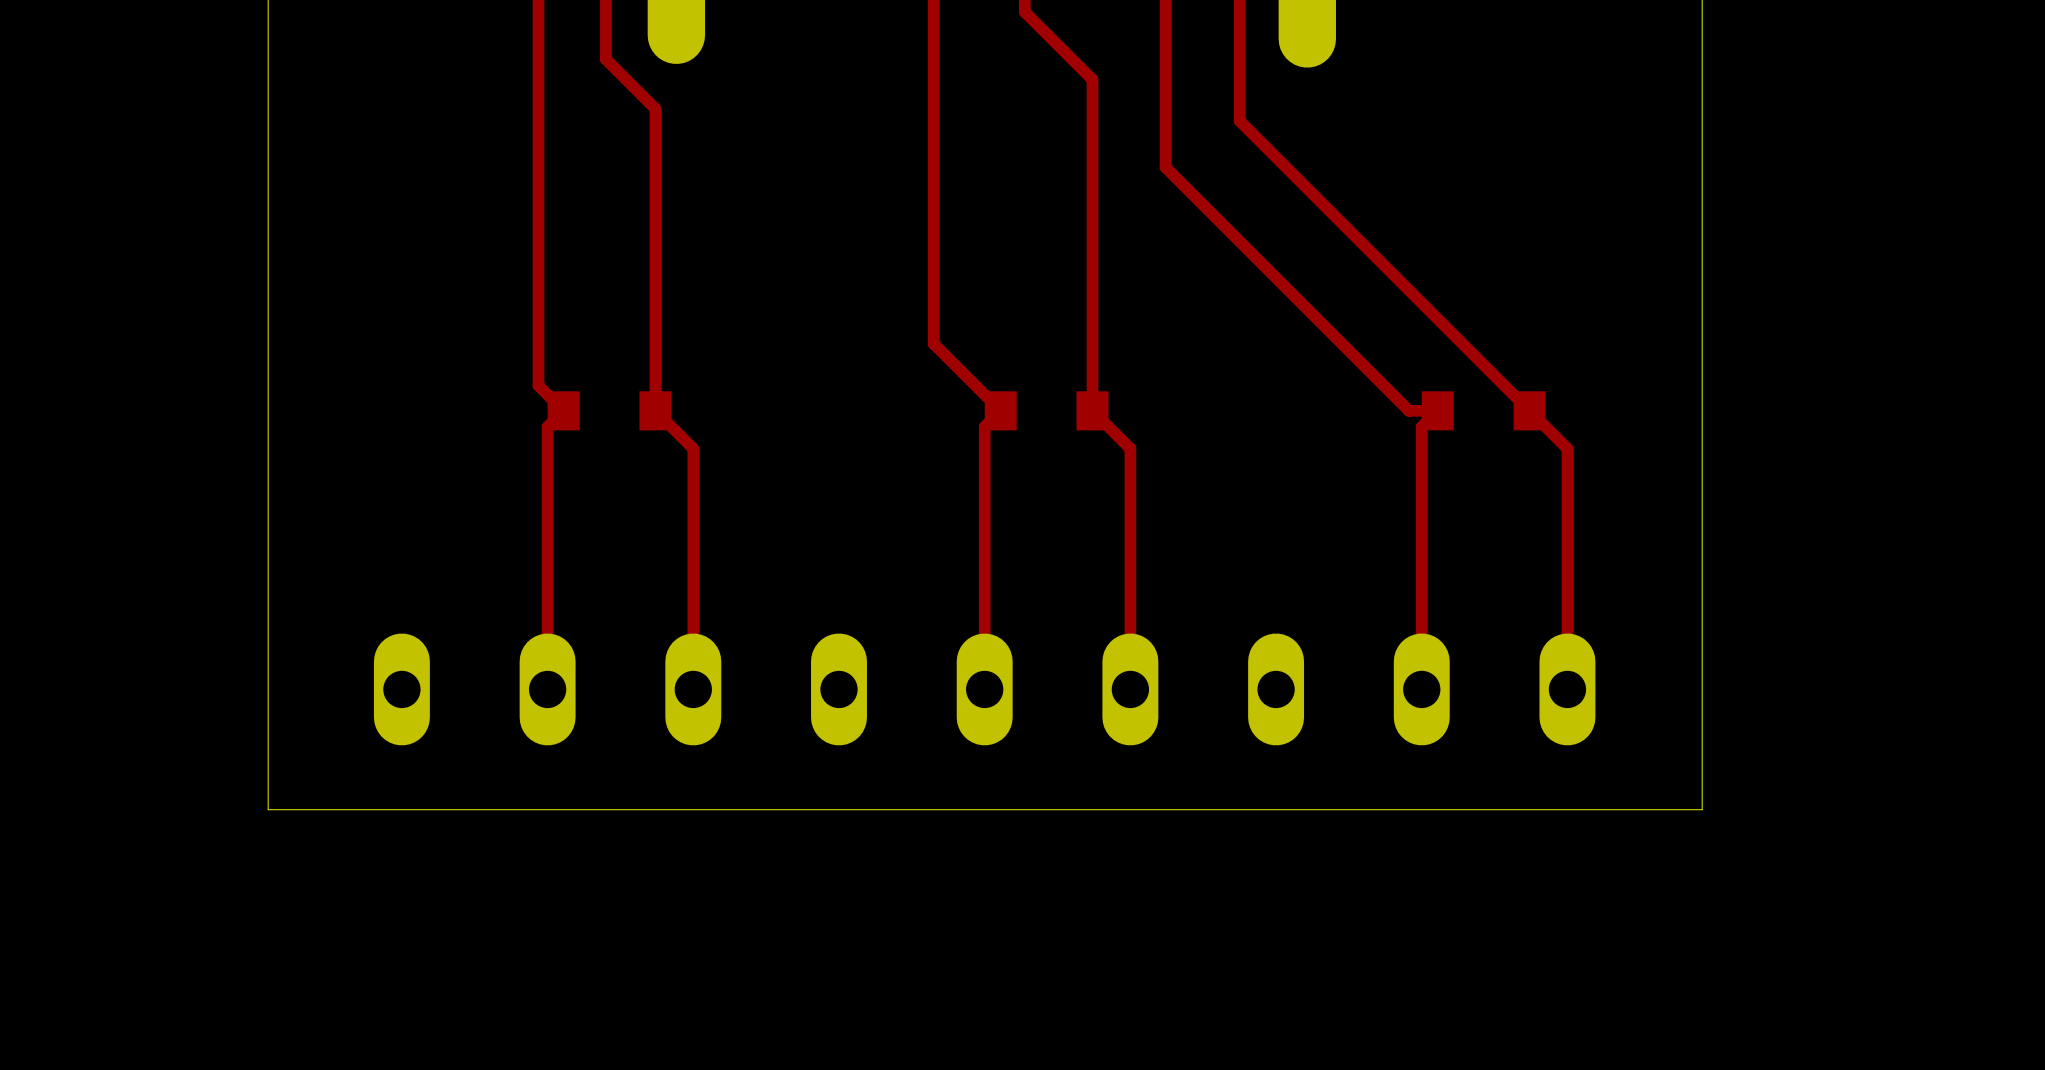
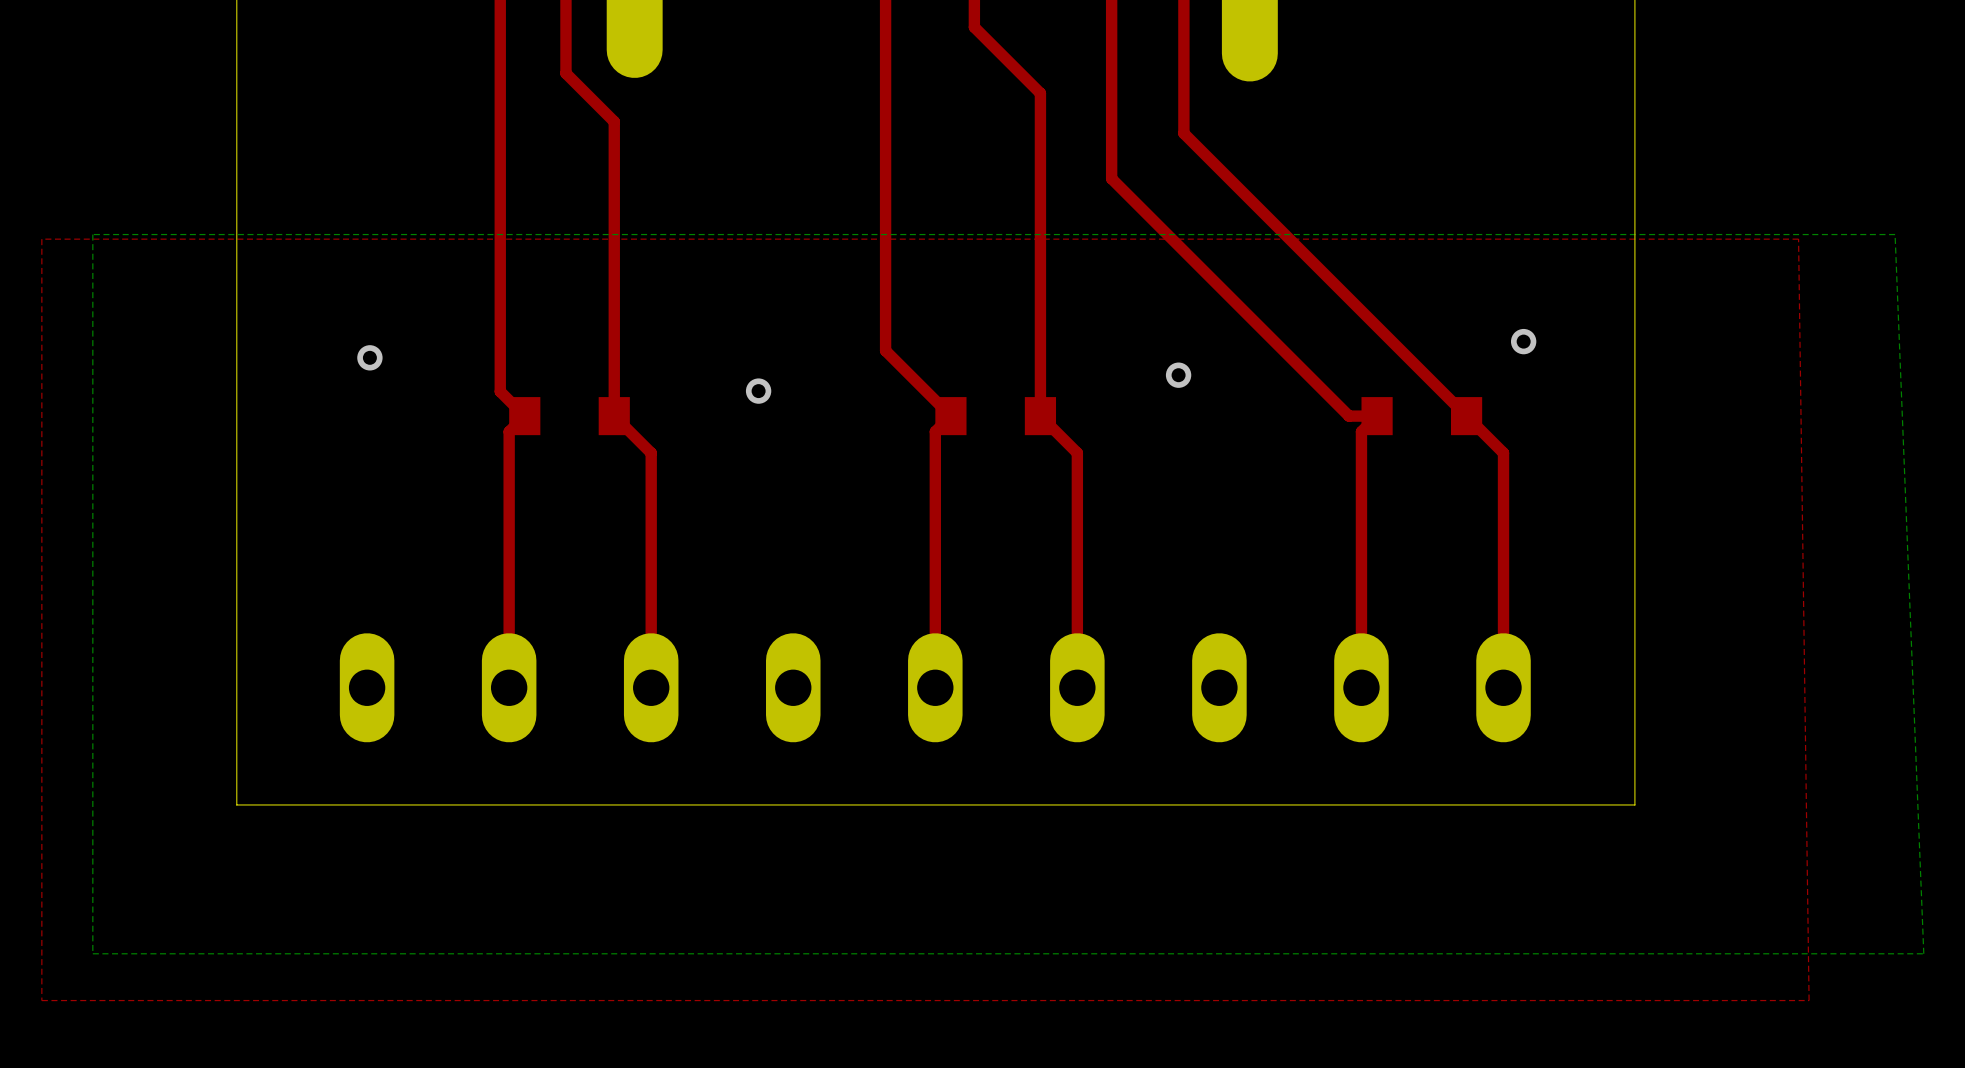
bottom zone outline: none -> (1895, 234) (92, 234) (92, 953) (1923, 953) (1895, 234)
top zone outline: none -> (1798, 239) (41, 239) (41, 1000) (1809, 1000) (1798, 239)
via: none -> (1523, 341)
via: none -> (369, 357)
via: none -> (1178, 375)
via: none -> (758, 391)

